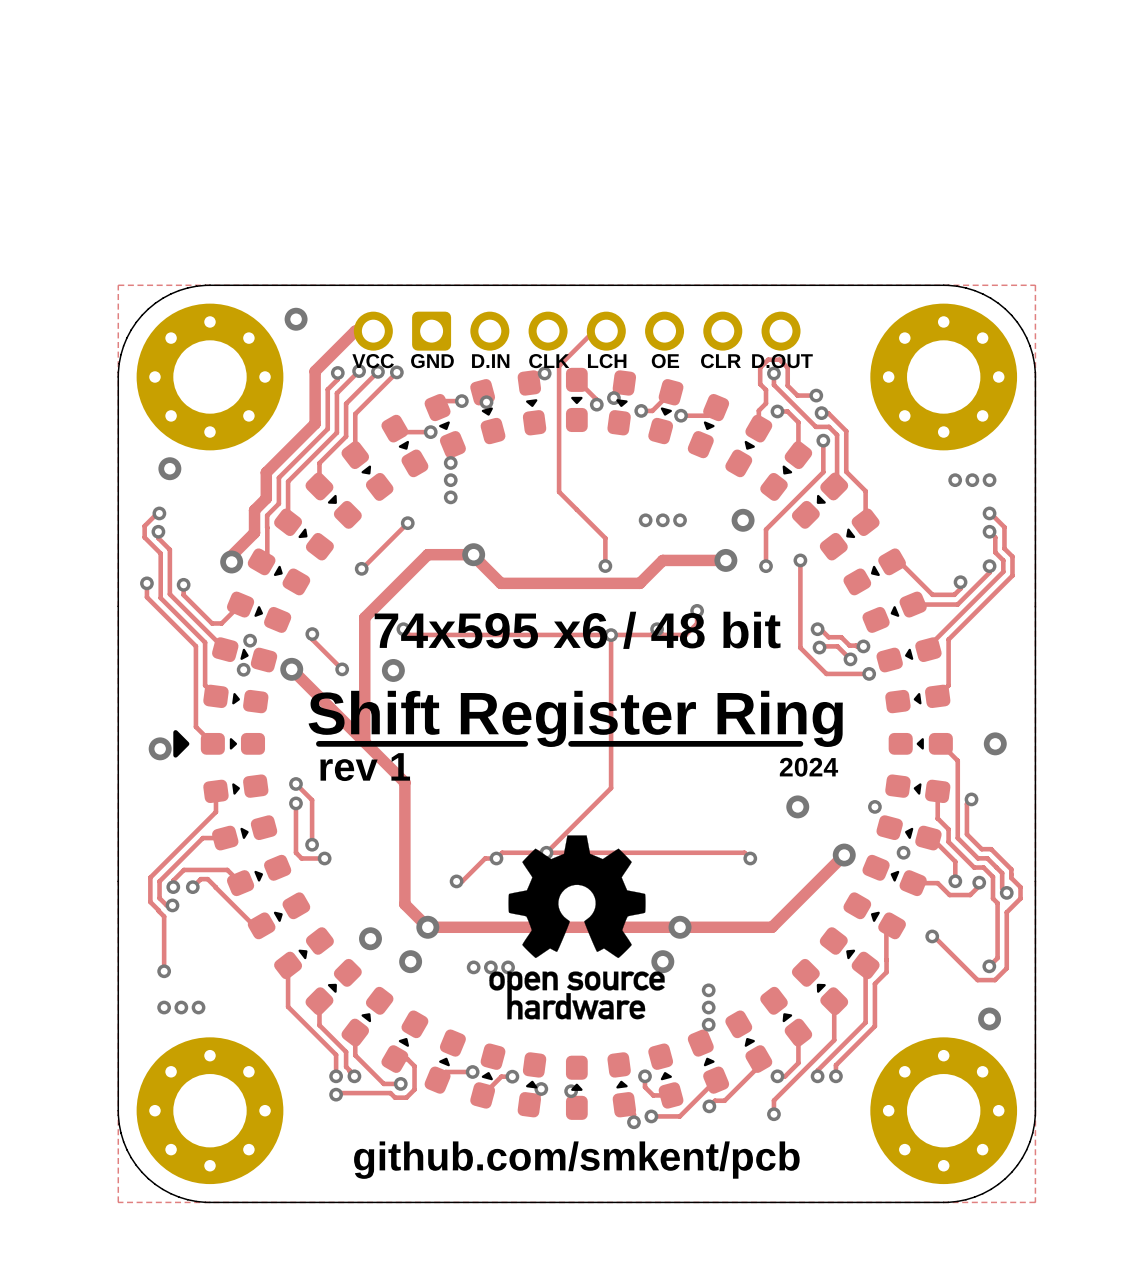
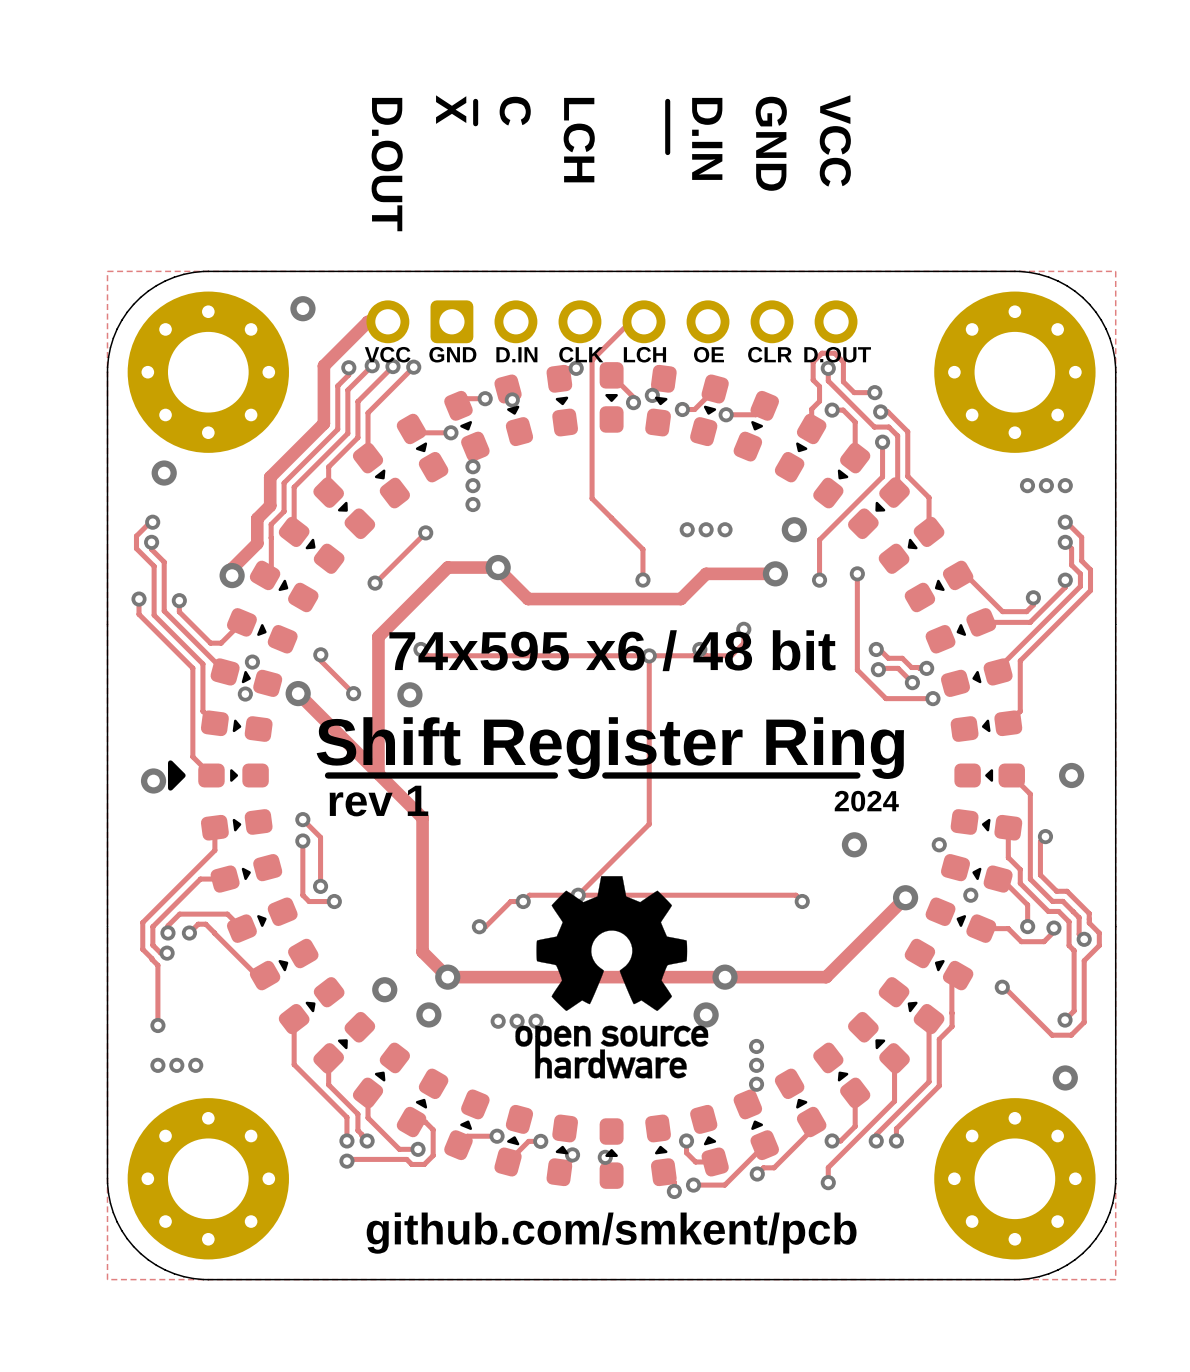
line: none -> (475, 101) (475, 123)
line: none -> (667, 101) (667, 152)
text: none -> X (451, 109)
text: none -> C (515, 111)
text: none -> D.IN (707, 138)
text: none -> LCH (579, 140)
text: none -> VCC (835, 140)
text: none -> GND (771, 143)
text: none -> D.OUT (387, 164)

